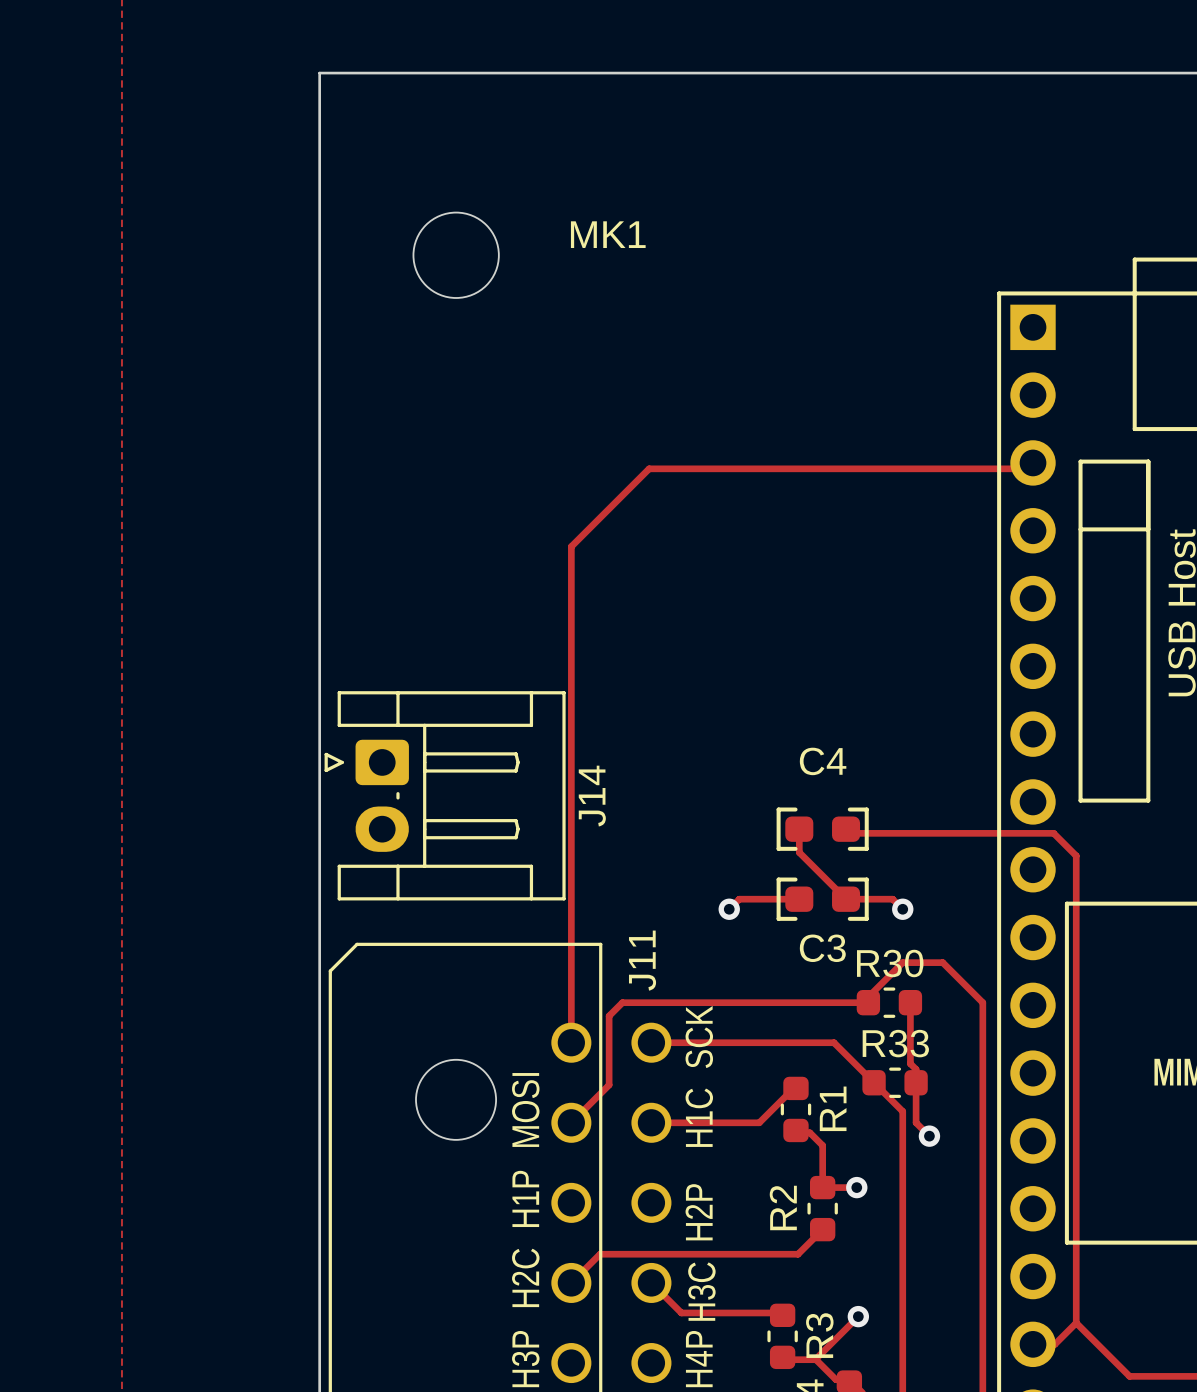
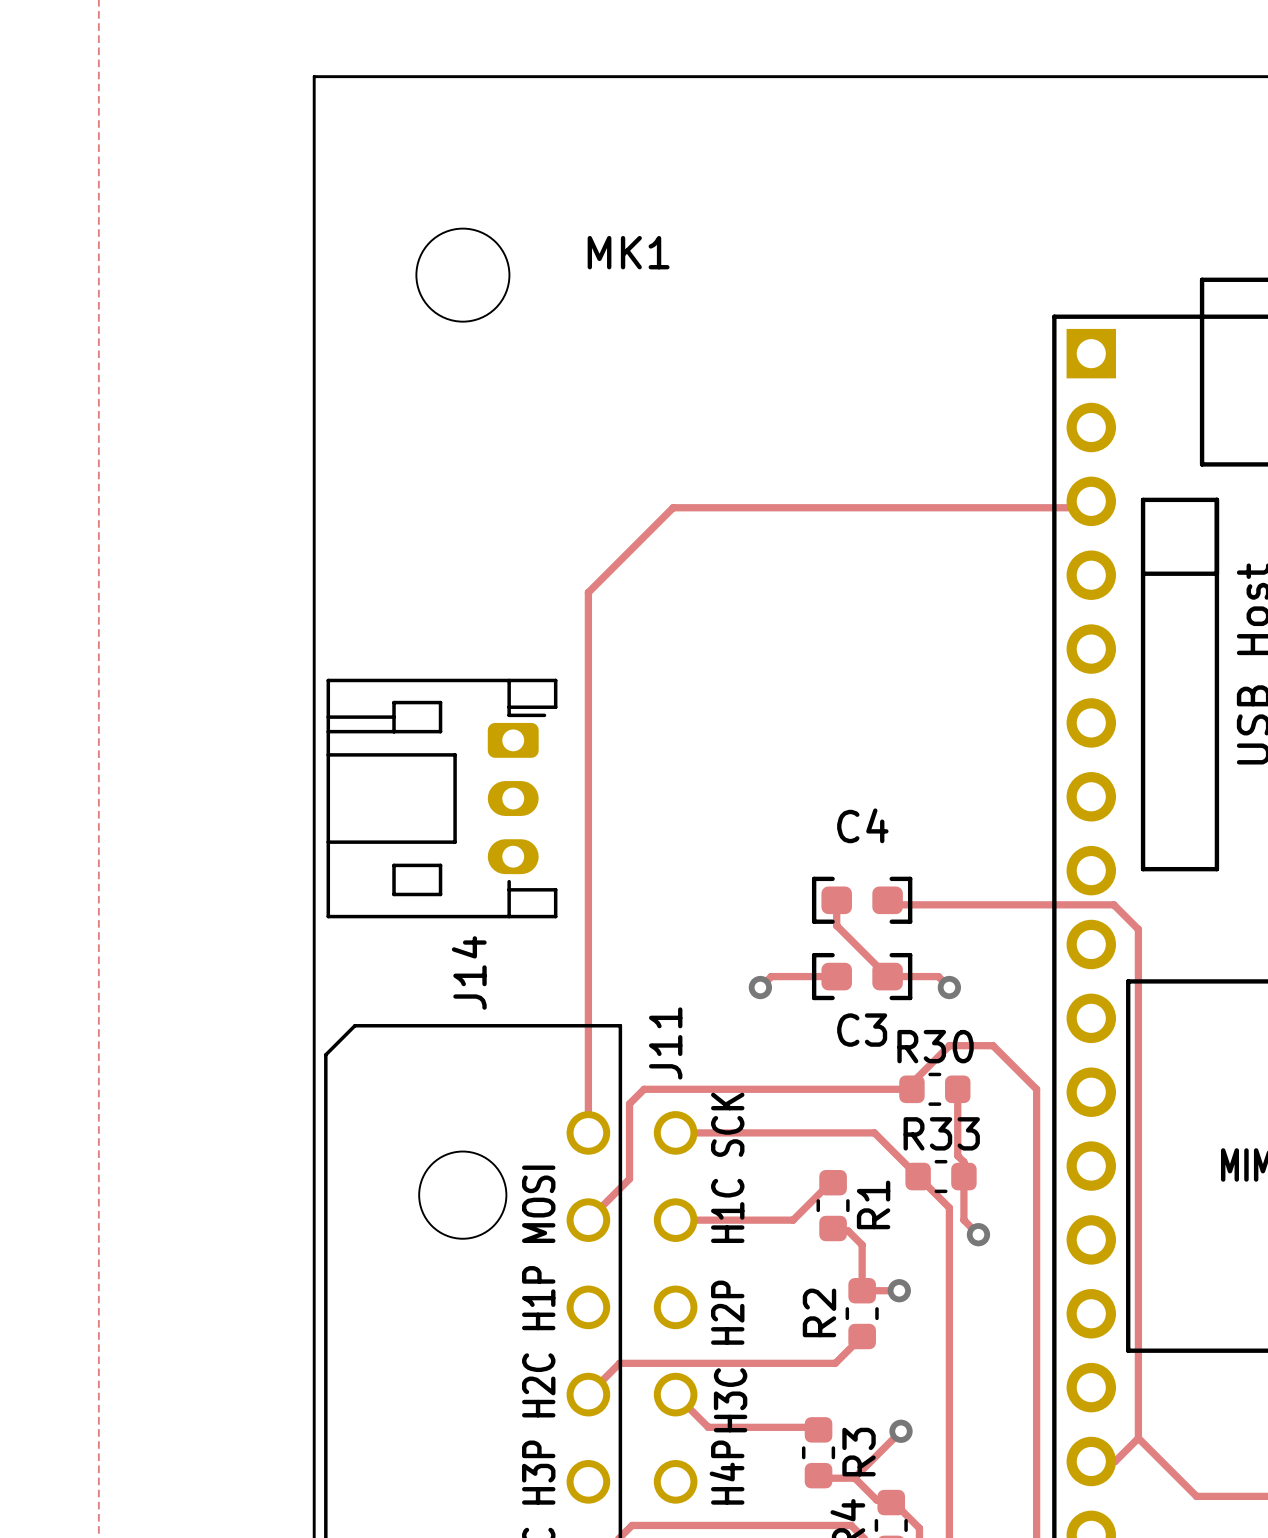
J14 footprint: [324, 691, 566, 901] -> [326, 678, 558, 919]
J14 name position: J14 (592, 796) -> J14 (469, 972)

